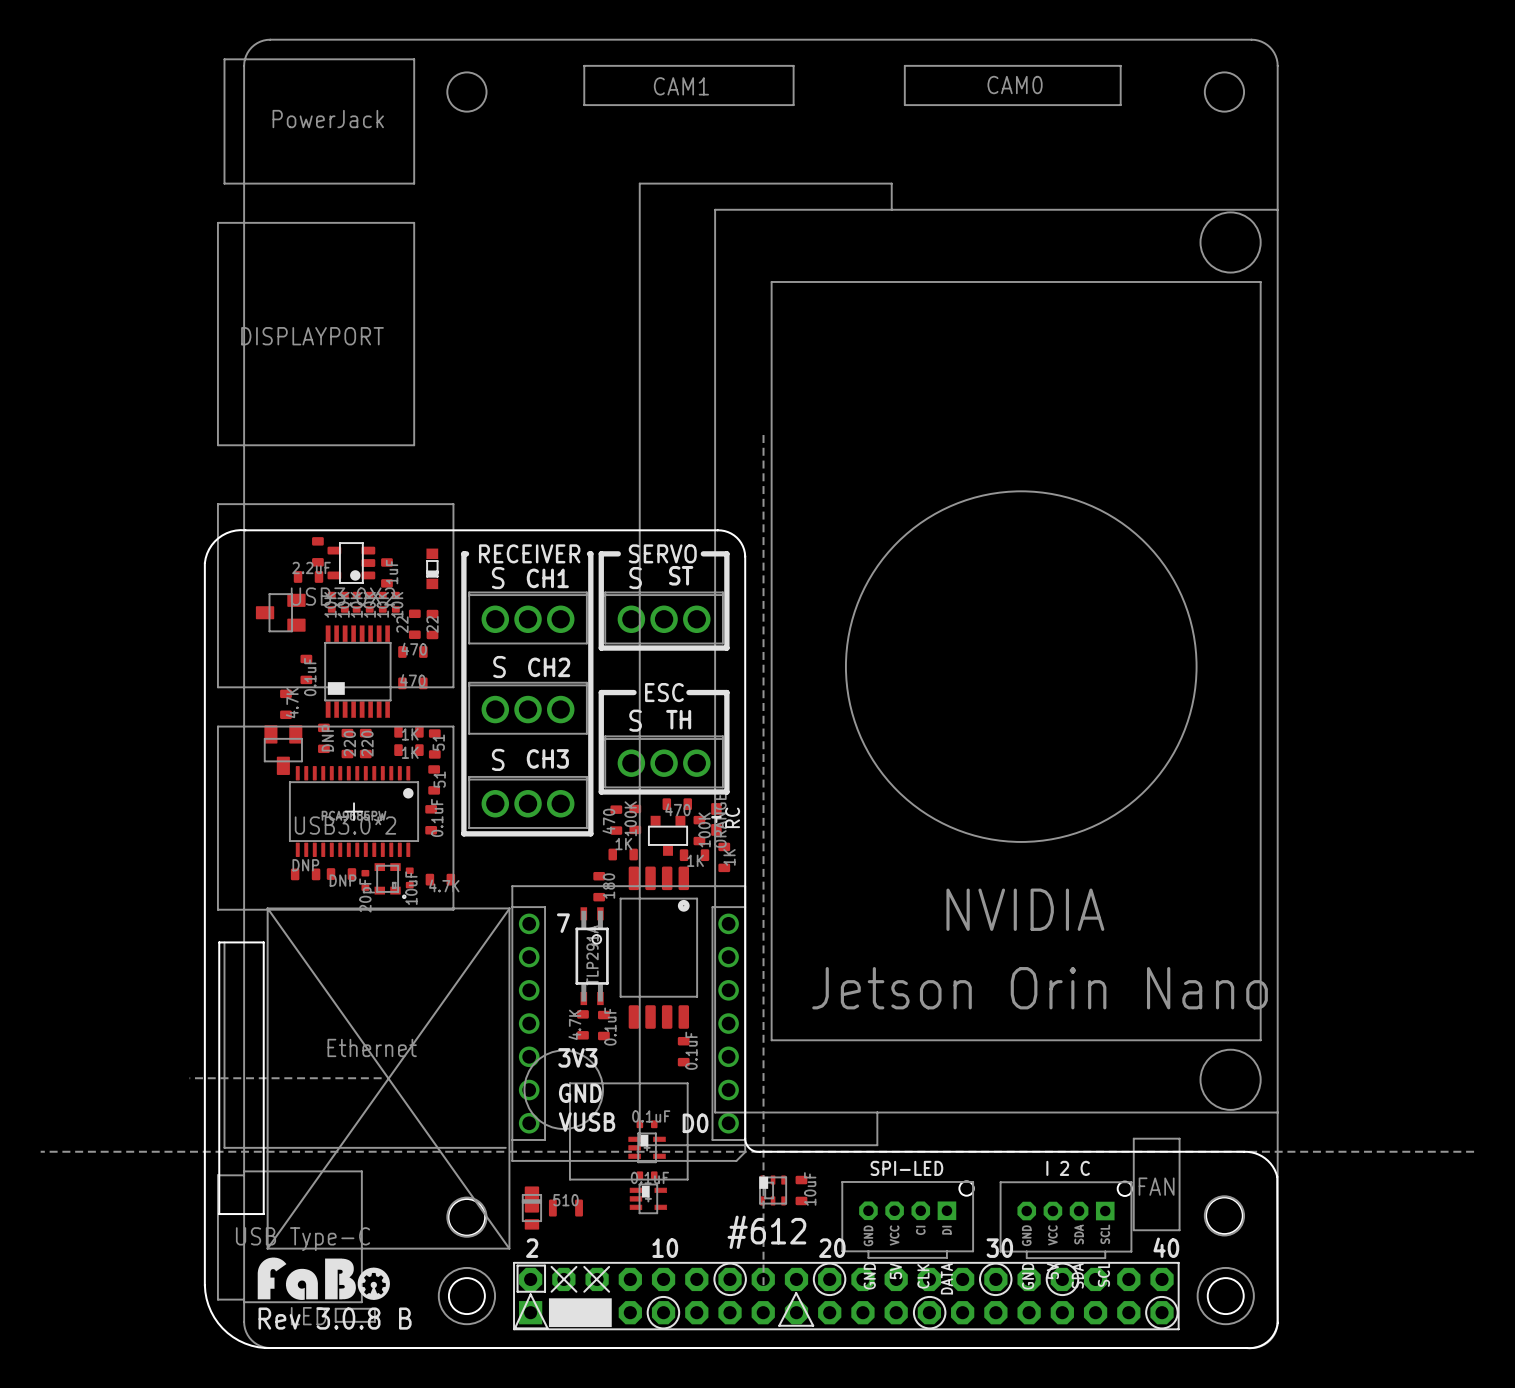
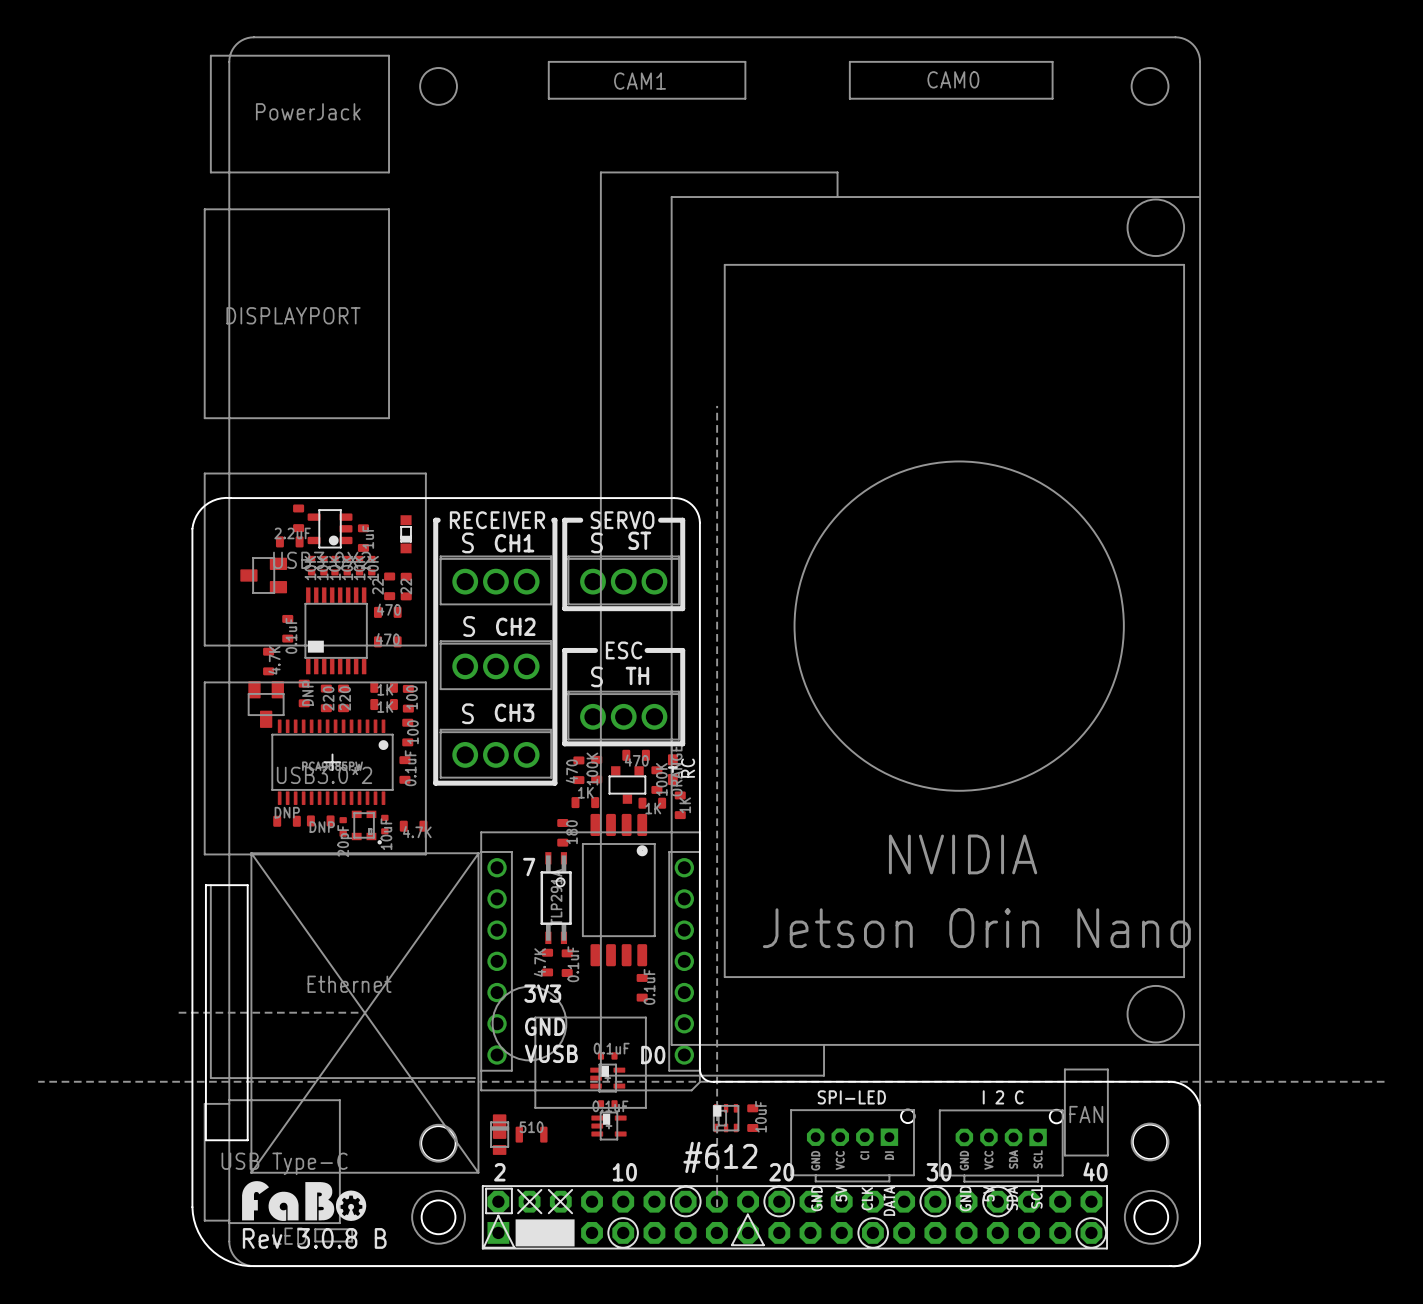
part value: 51 (438, 742) -> 100 (412, 697)
part value: 51 (439, 779) -> 100 (412, 732)

